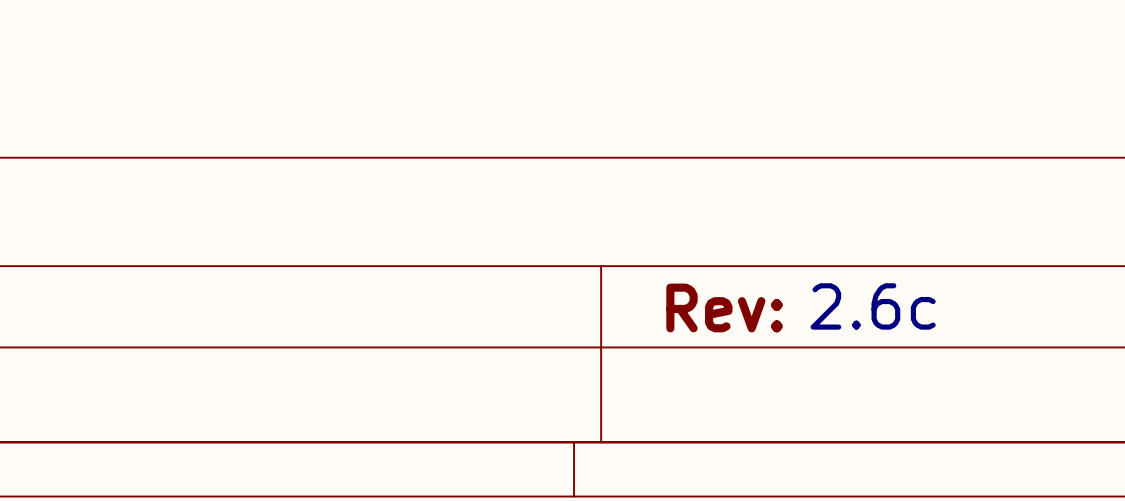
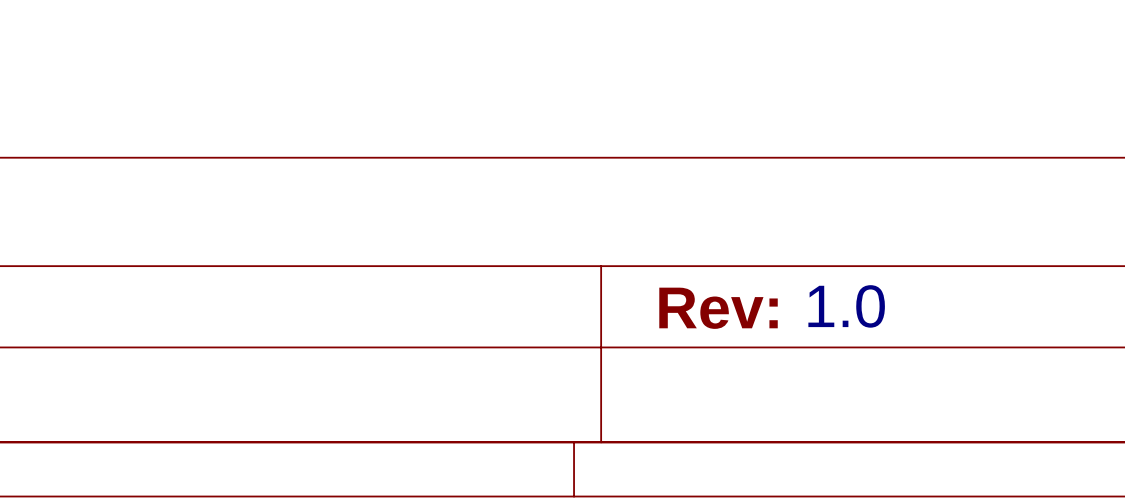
text: 2.6c (873, 306) -> 1.0 (846, 306)

